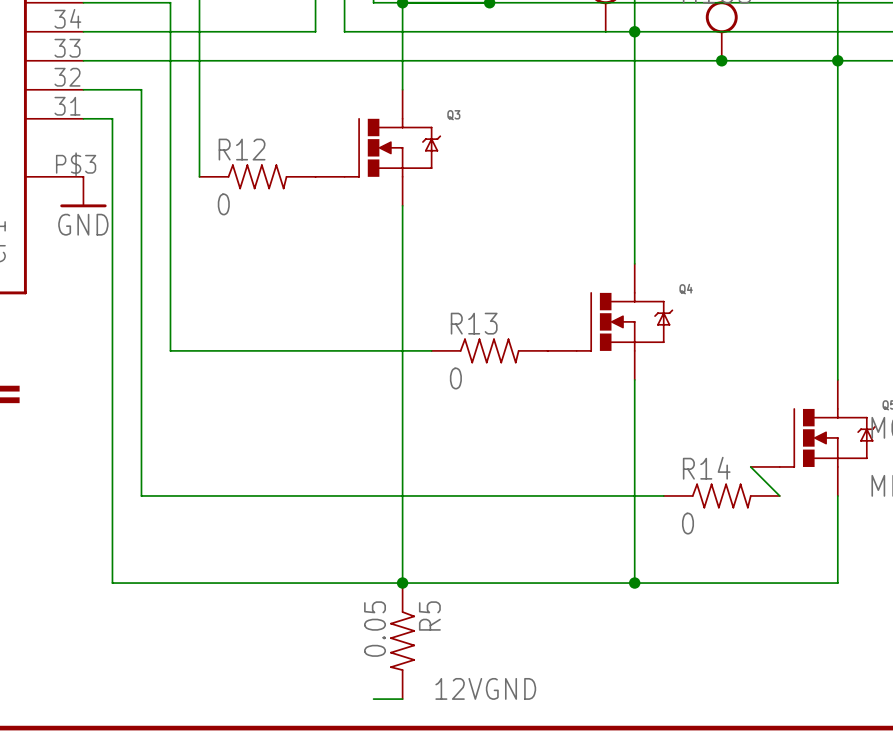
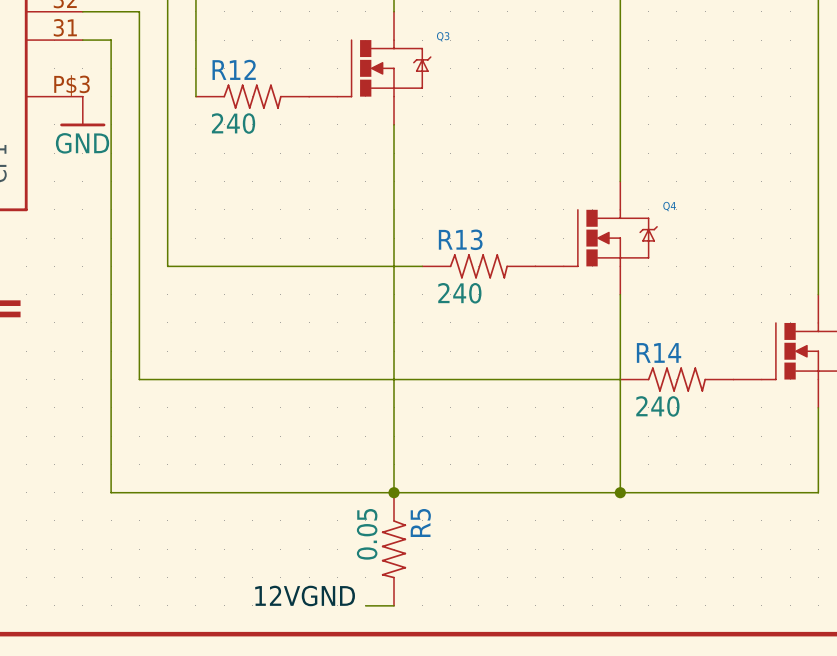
R12 value: 0 (223, 204) -> 240 (233, 123)
R13 value: 0 (455, 378) -> 240 (459, 293)
wire: (141, 466) (141, 495) (663, 495) -> (139, 379) (620, 379)
wire: (750, 466) (779, 495) -> none
R14 position: (721, 495) -> (676, 379)
R14 value: 0 (688, 523) -> 240 (657, 406)
label position: 12VGND (485, 688) -> 12VGND (305, 595)

